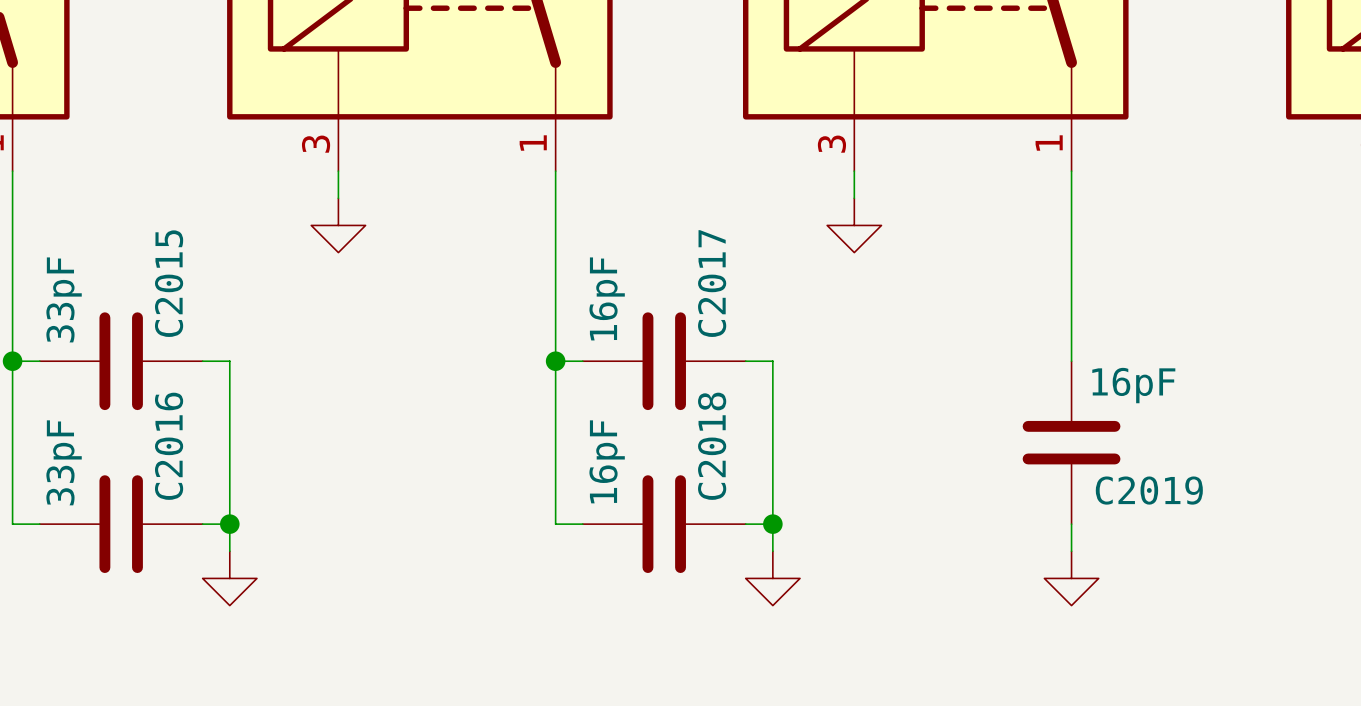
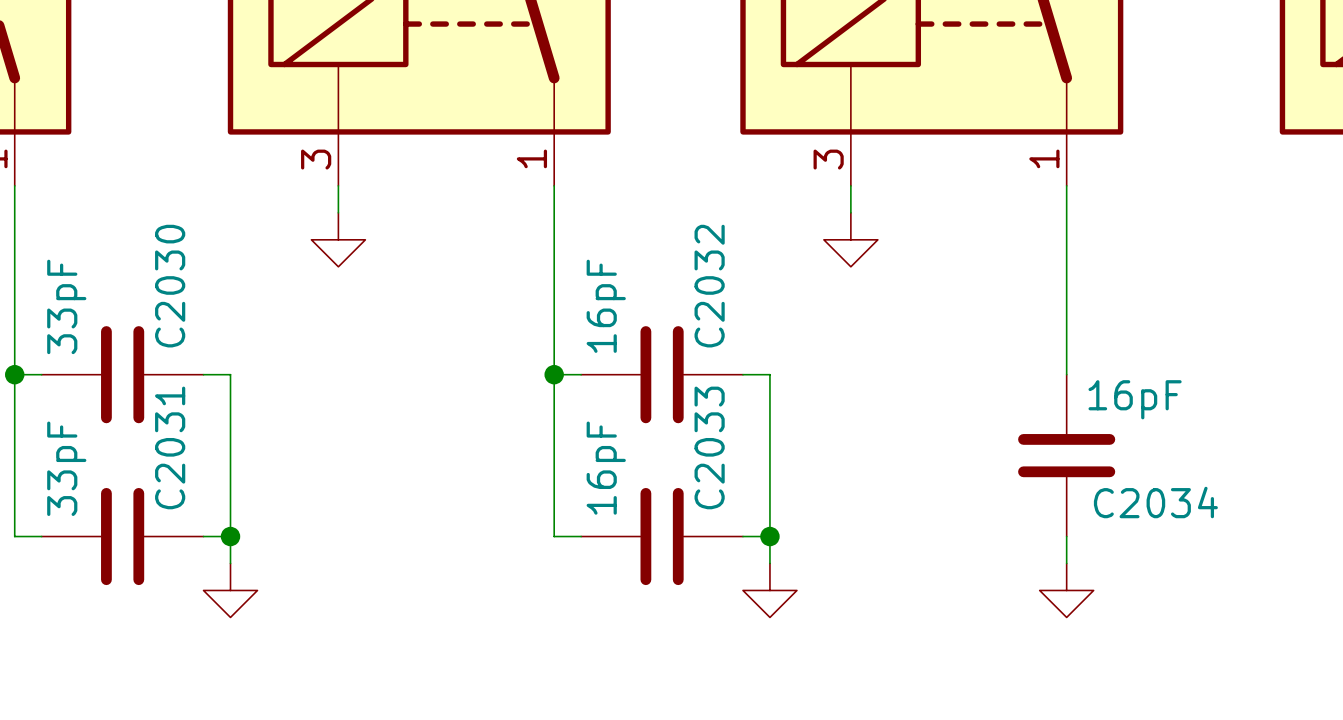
C2015 name: C2015 (169, 283) -> C2030 (170, 286)
C2017 name: C2017 (712, 283) -> C2032 (709, 286)
C2016 name: C2016 (169, 446) -> C2031 (170, 447)
C2018 name: C2018 (712, 446) -> C2033 (709, 447)
C2019 name: C2019 (1149, 490) -> C2034 (1155, 502)

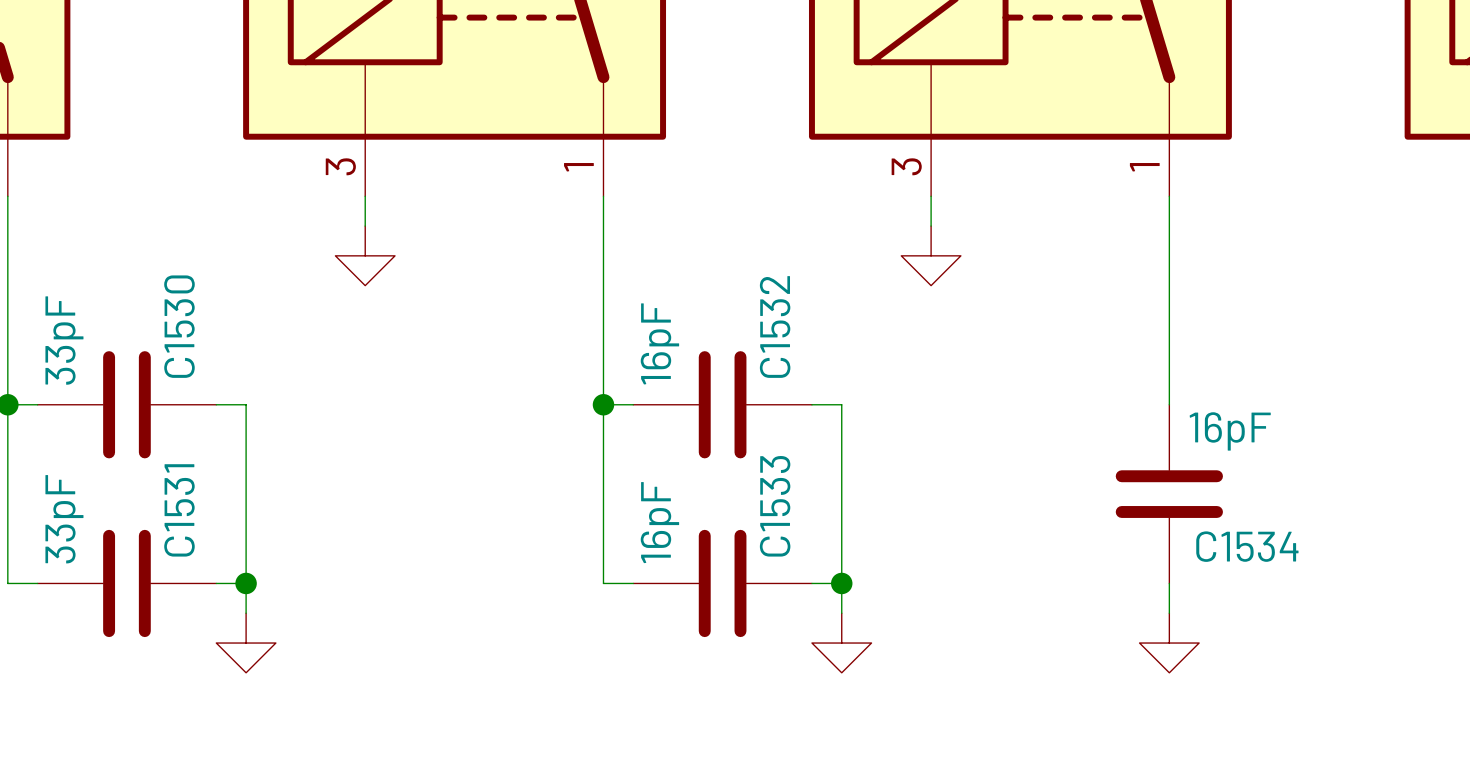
C2030 name: C2030 (170, 286) -> C1530 (179, 326)
C2032 name: C2032 (709, 286) -> C1532 (775, 326)
C2031 name: C2031 (170, 447) -> C1531 (179, 510)
C2033 name: C2033 (709, 447) -> C1533 (775, 506)
C2034 name: C2034 (1155, 502) -> C1534 (1247, 546)

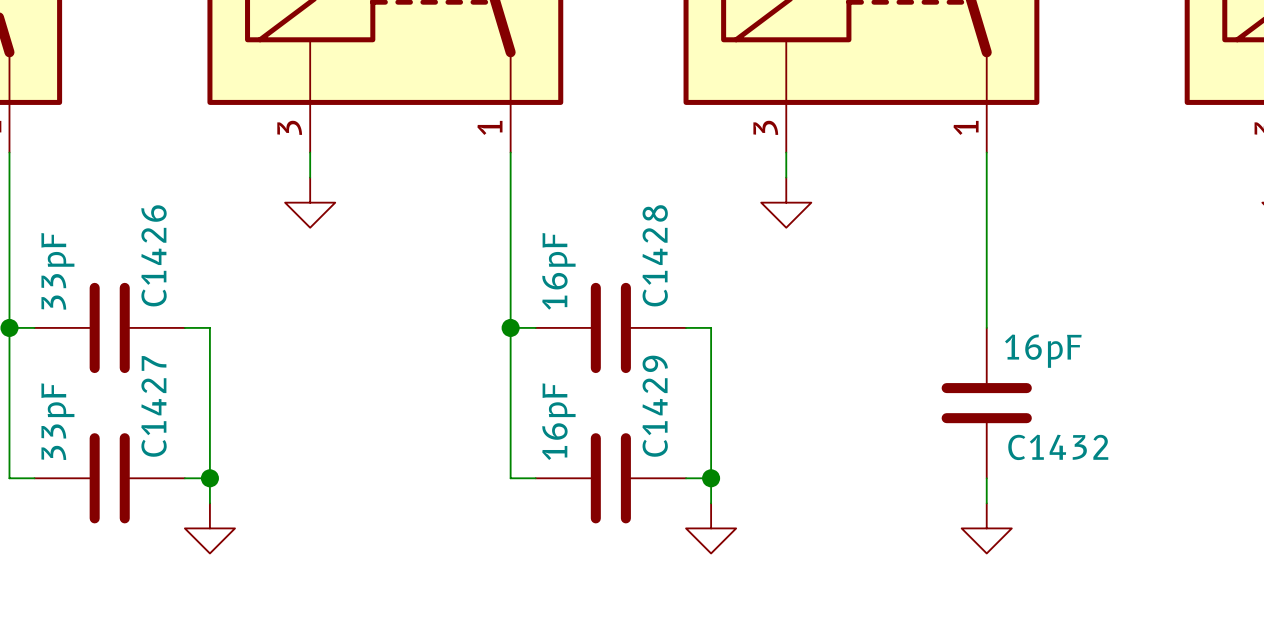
C1530 name: C1530 (179, 326) -> C1426 (154, 255)
C1532 name: C1532 (775, 326) -> C1428 (655, 255)
C1533 name: C1533 (775, 506) -> C1429 (655, 406)
C1531 name: C1531 (179, 510) -> C1427 (154, 406)
C1534 name: C1534 (1247, 546) -> C1432 (1058, 447)

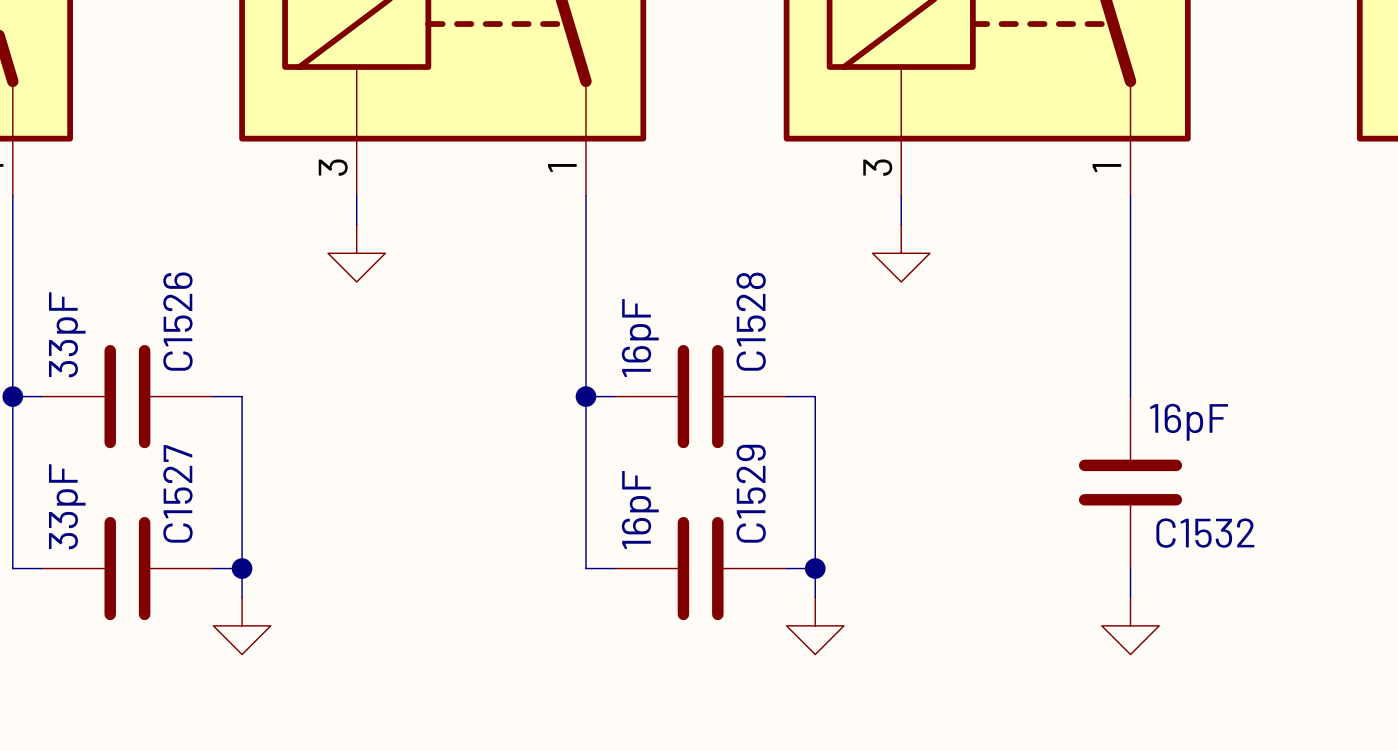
C1426 name: C1426 (154, 255) -> C1526 (177, 321)
C1428 name: C1428 (655, 255) -> C1528 (751, 321)
C1427 name: C1427 (154, 406) -> C1527 (177, 493)
C1429 name: C1429 (655, 406) -> C1529 (751, 493)
C1432 name: C1432 (1058, 447) -> C1532 (1205, 533)

